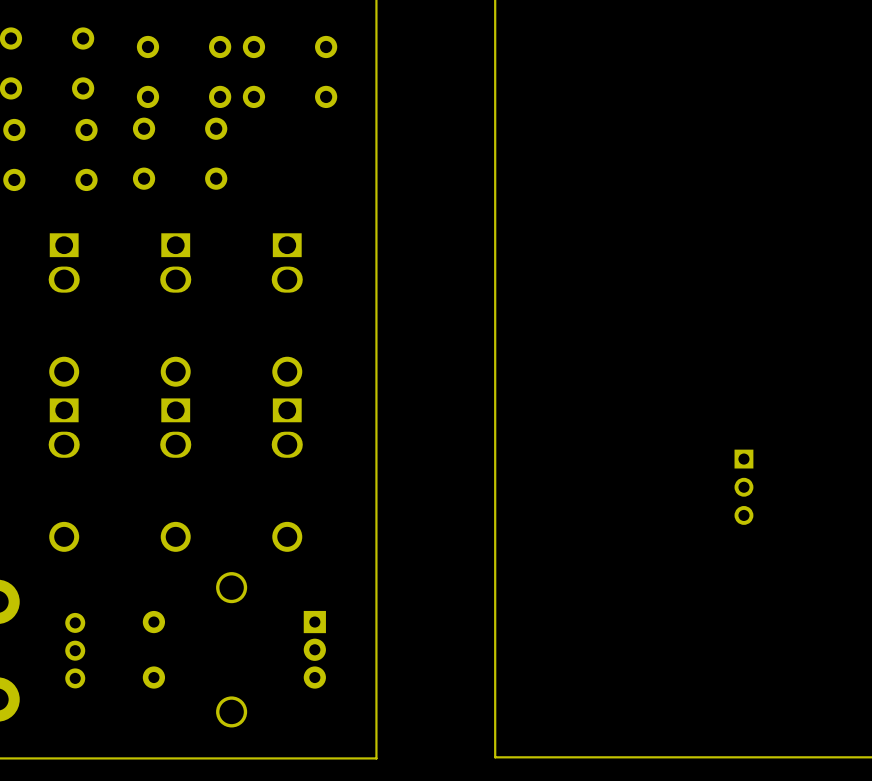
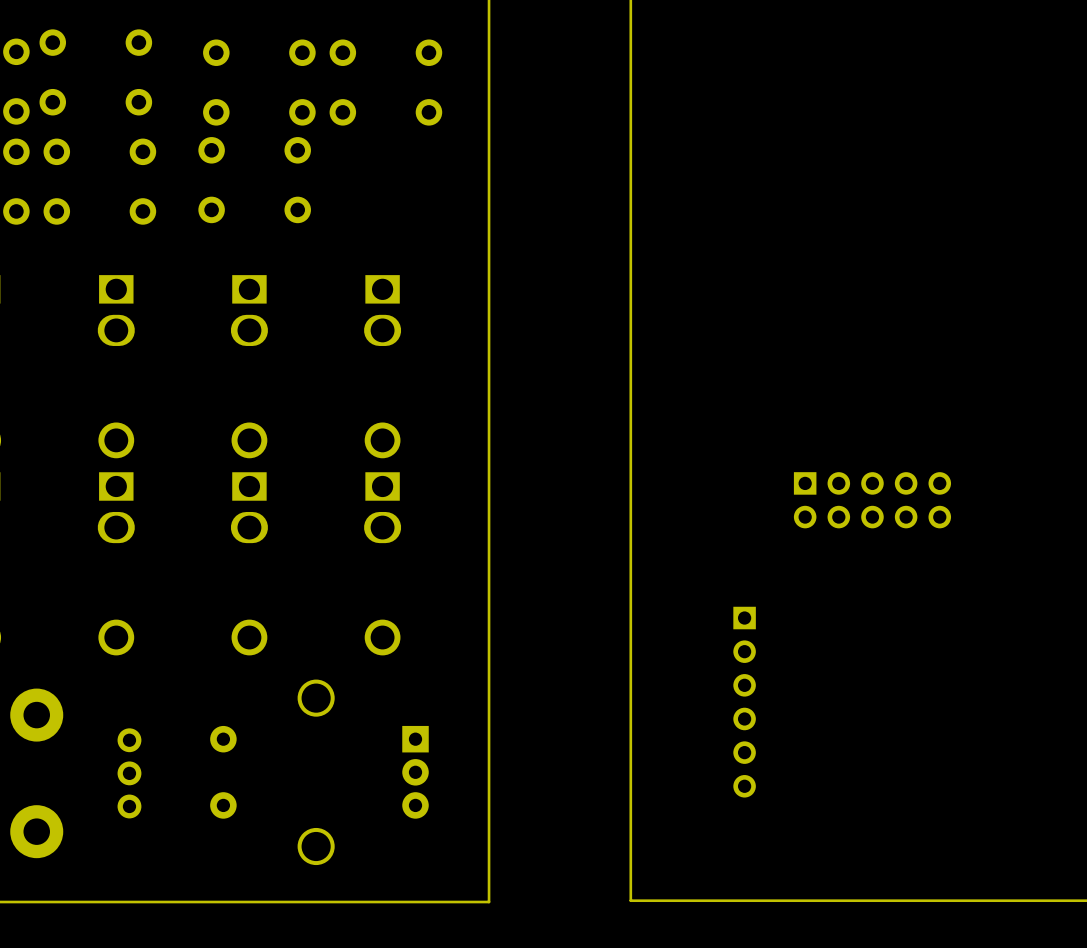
part: none -> (872, 500)
part: (743, 487) -> none
part: none -> (744, 702)

